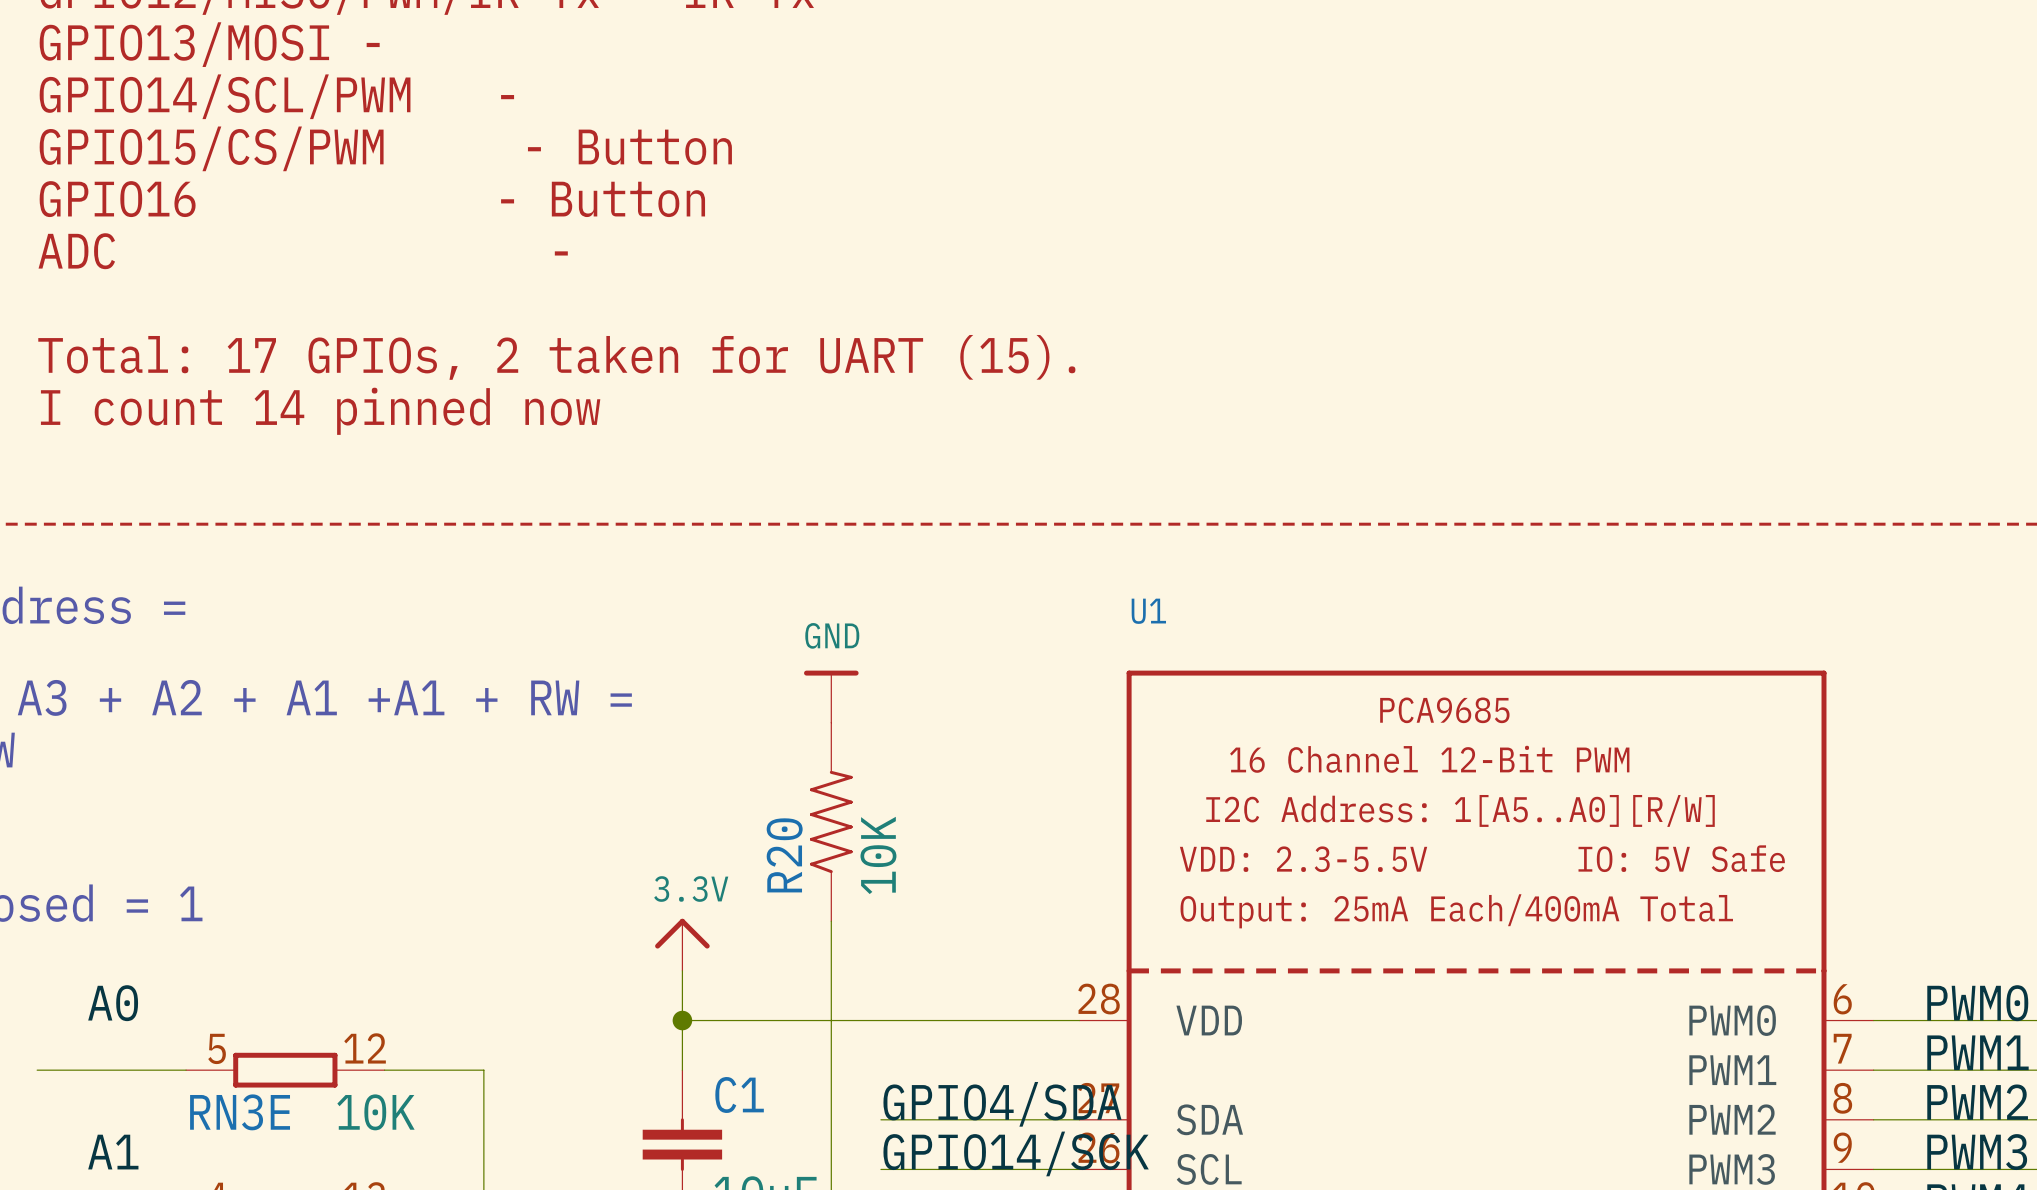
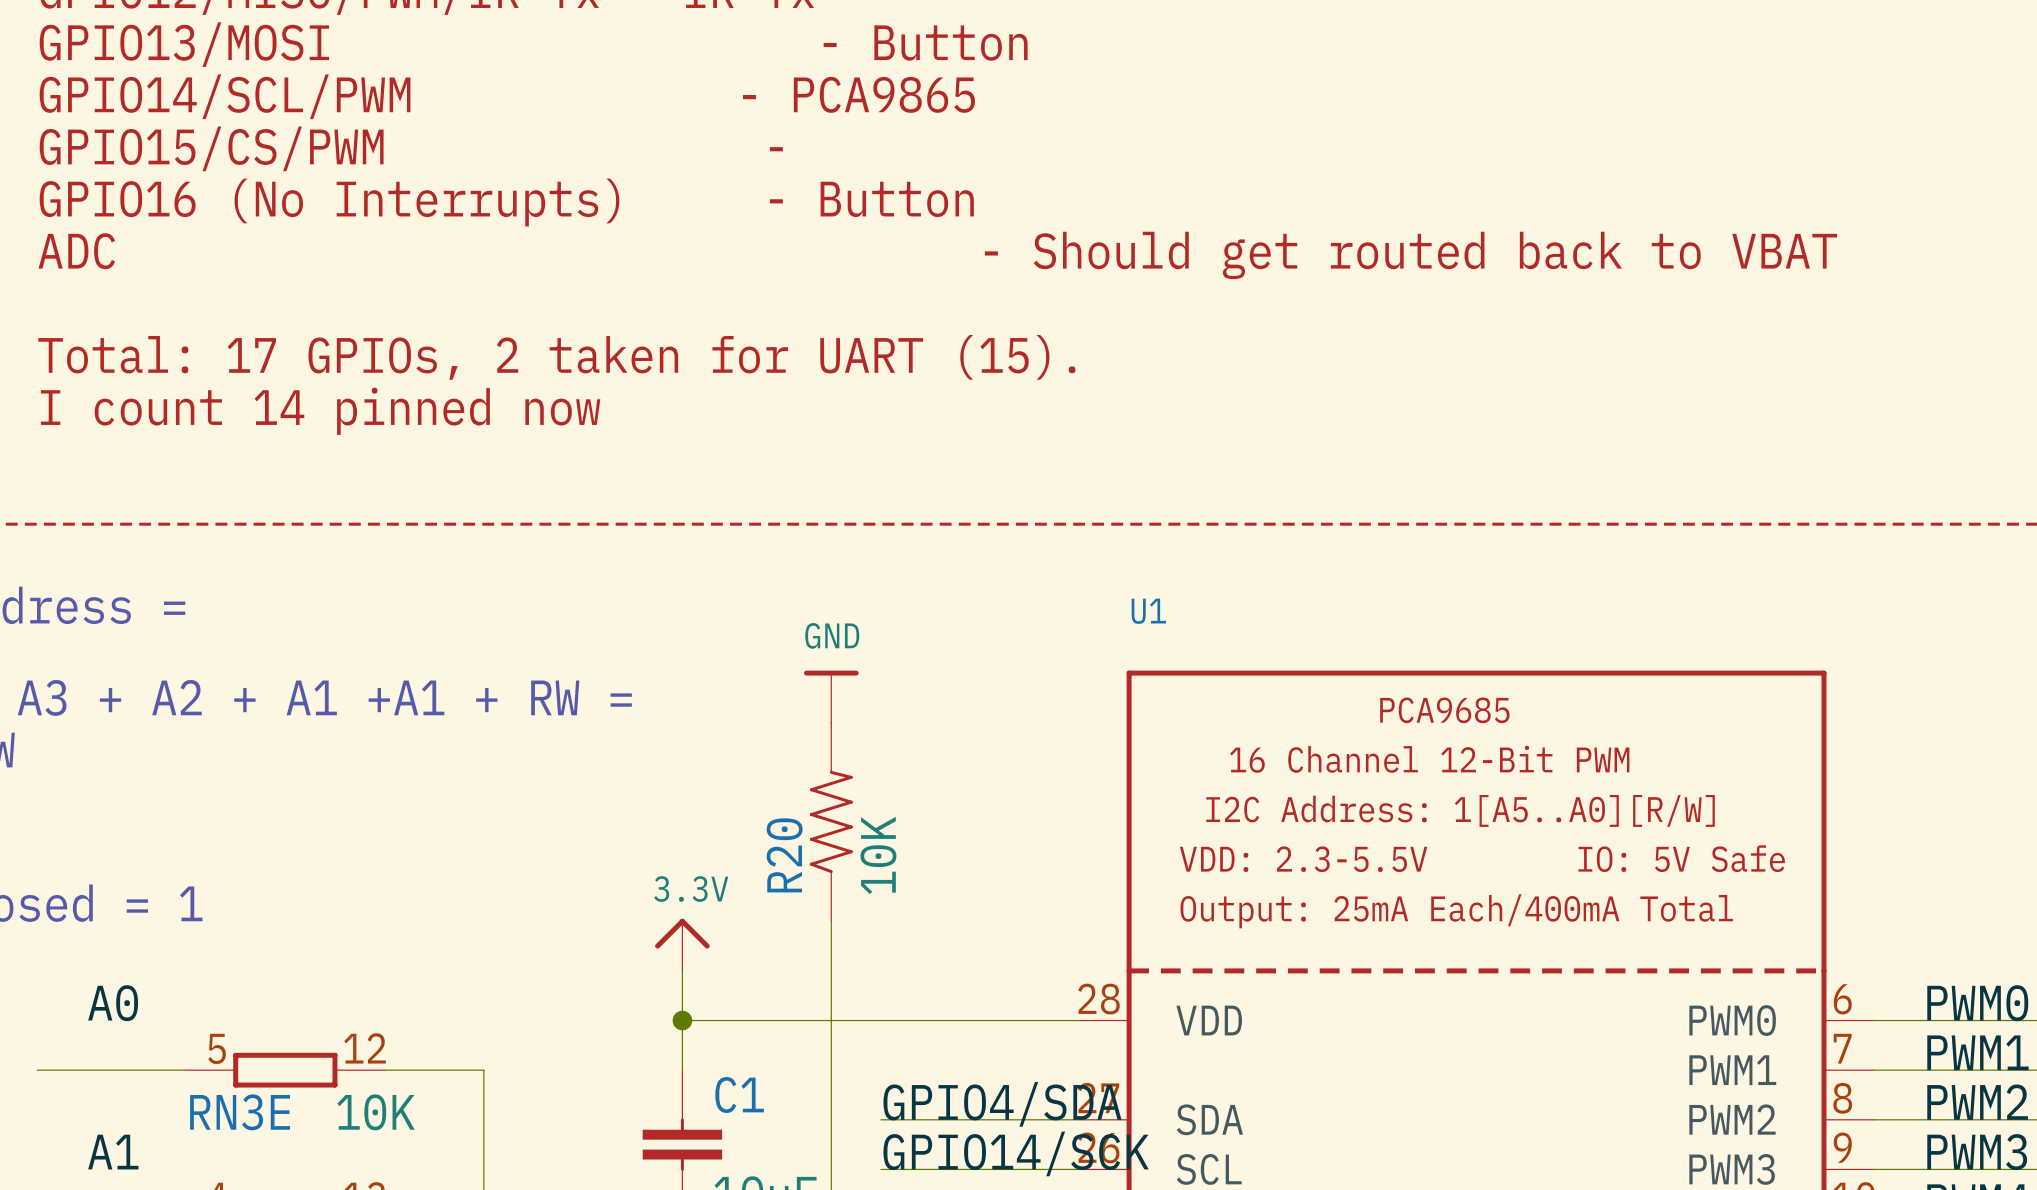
text: GPIO13/MOSI - (209, 44) -> GPIO13/MOSI - Button (533, 44)
text: GPIO14/SCL/PWM - (276, 96) -> GPIO14/SCL/PWM - PCA9865 (507, 96)
text: GPIO15/CS/PWM - Button (385, 148) -> GPIO15/CS/PWM - (411, 148)
text: GPIO16 - Button (372, 199) -> GPIO16 (No Interrupts) - Button (506, 202)
text: ADC - (303, 251) -> ADC - Should get routed back to VBAT (937, 255)

